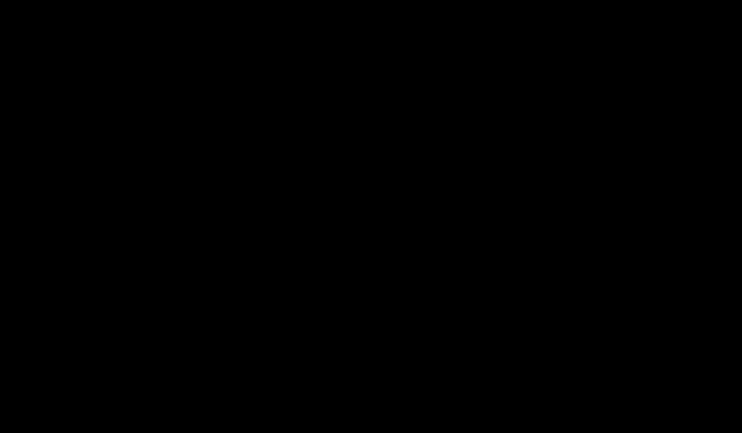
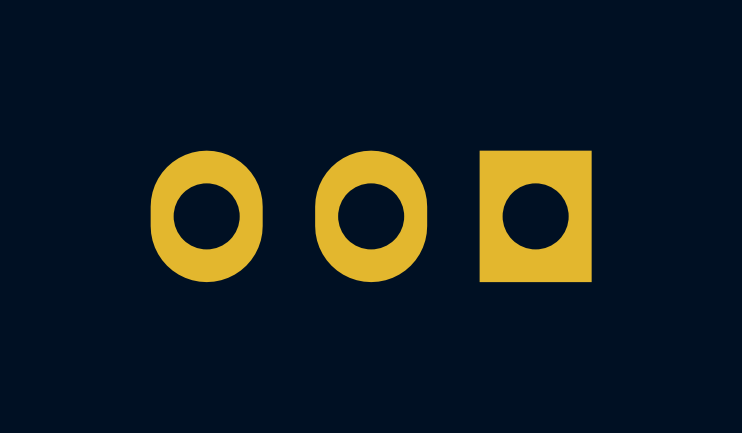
part: none -> (371, 216)

